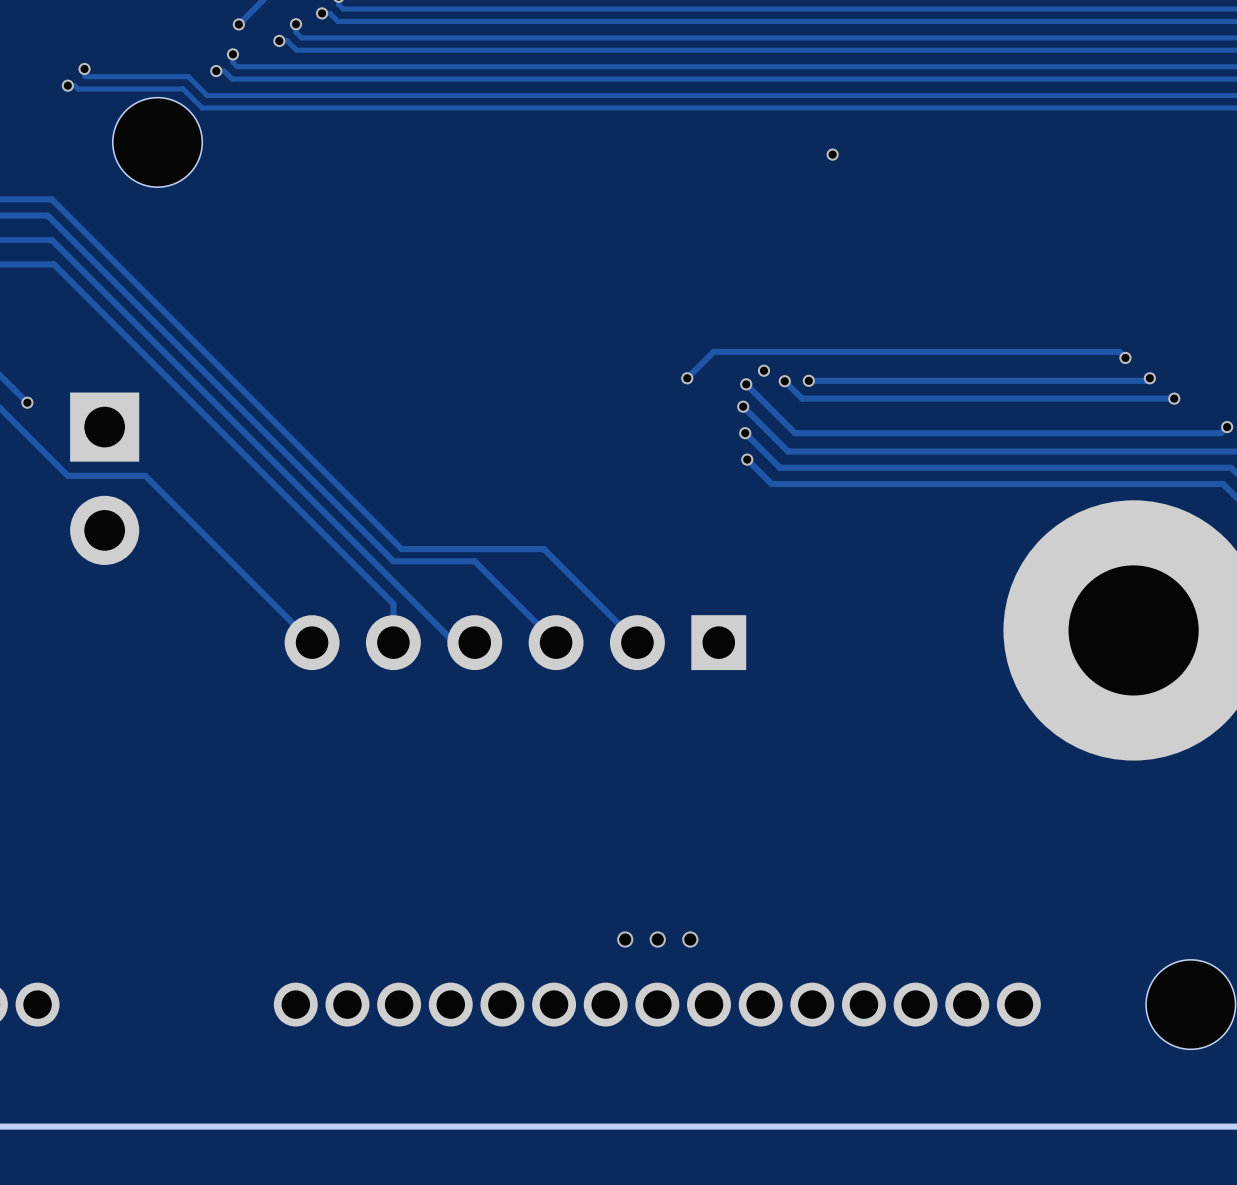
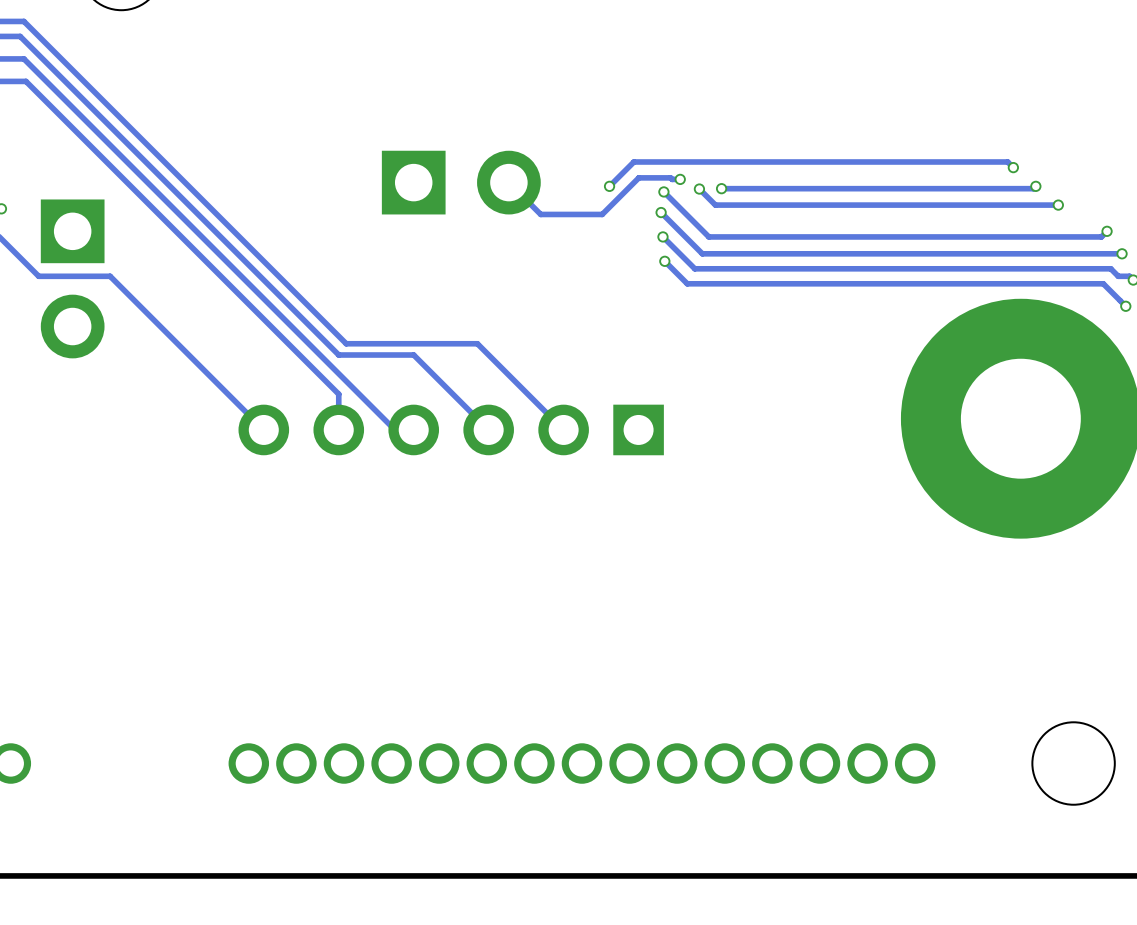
track: none -> (680, 179) (638, 177) (602, 214) (540, 214) (508, 182)
part: none -> (461, 182)
via: (625, 939) -> none
via: (657, 939) -> none
via: (690, 939) -> none

